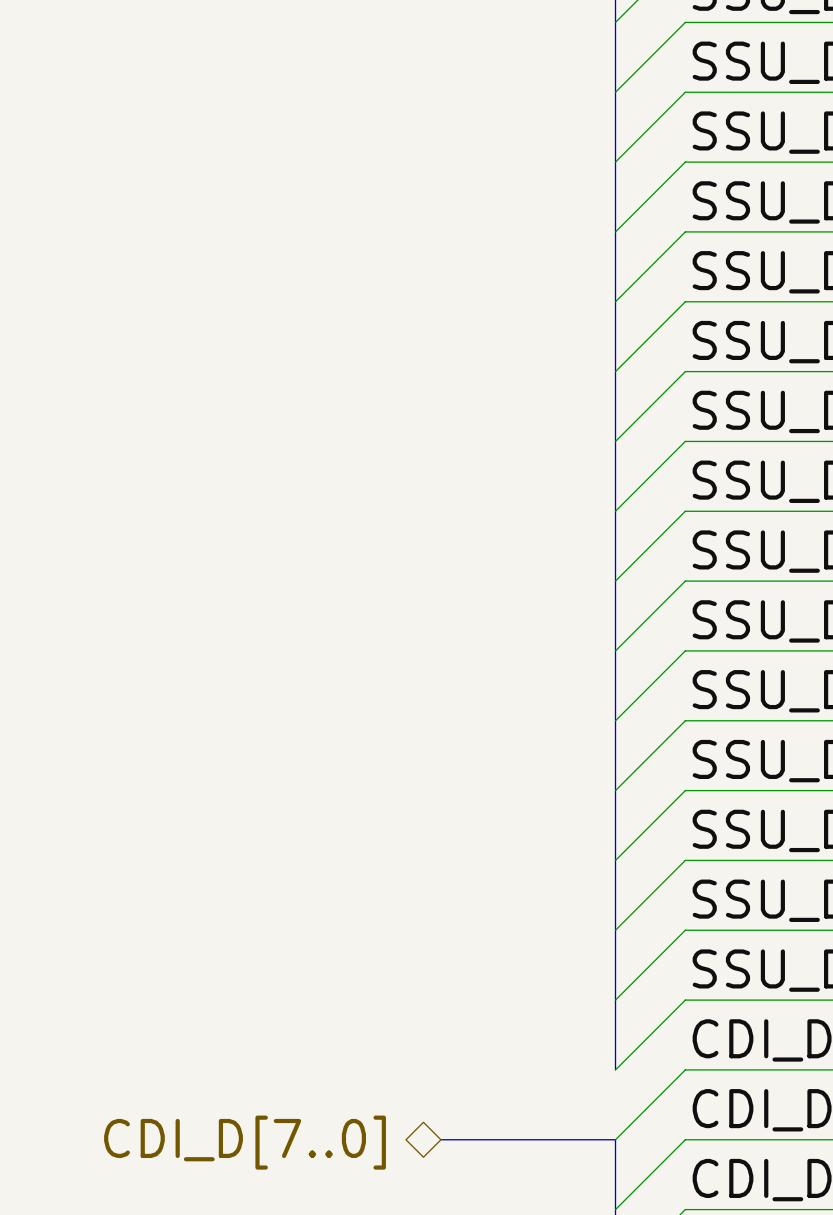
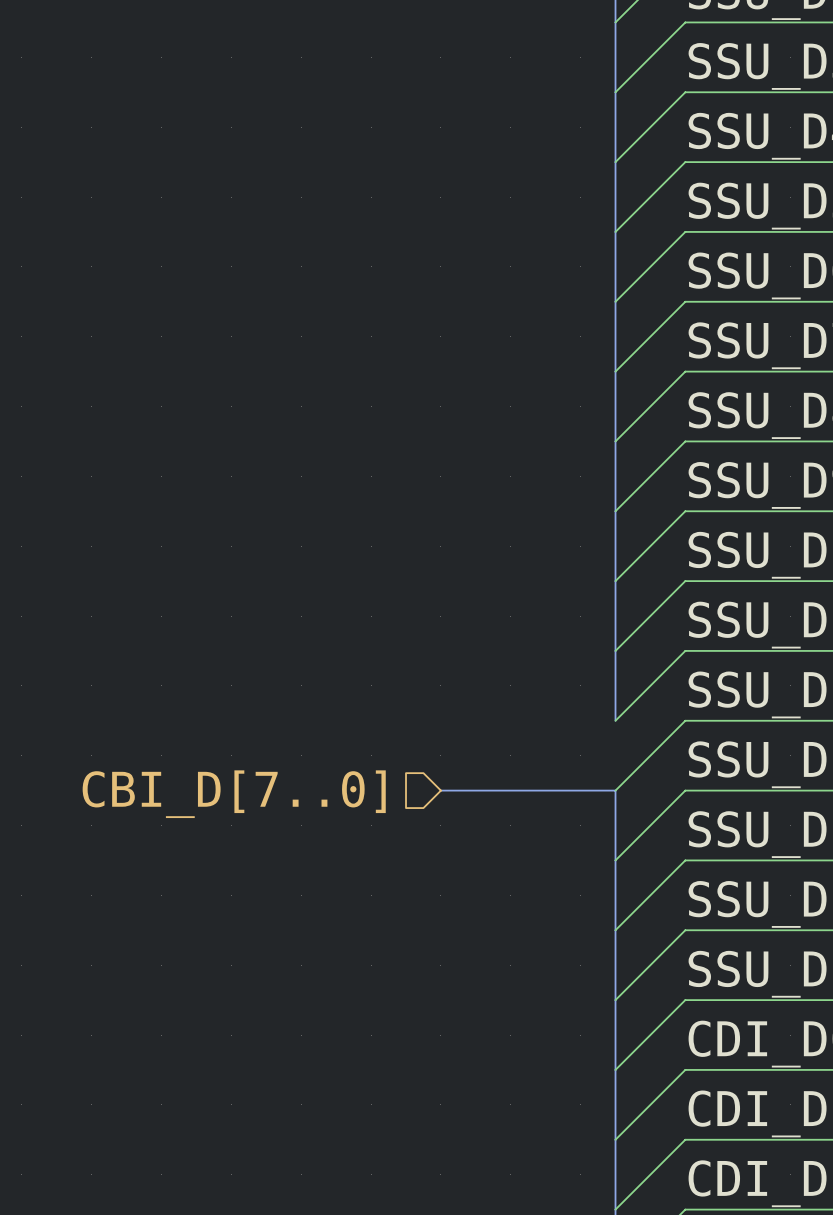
bus: (615, 720) (615, 790) -> (440, 790) (615, 790)
hierarchical label: none -> CBI_D[7..0] (234, 794)
bus: (440, 1139) (615, 1139) -> (615, 1069) (615, 1139)
hierarchical label: CDI_D[7..0] (245, 1142) -> none

